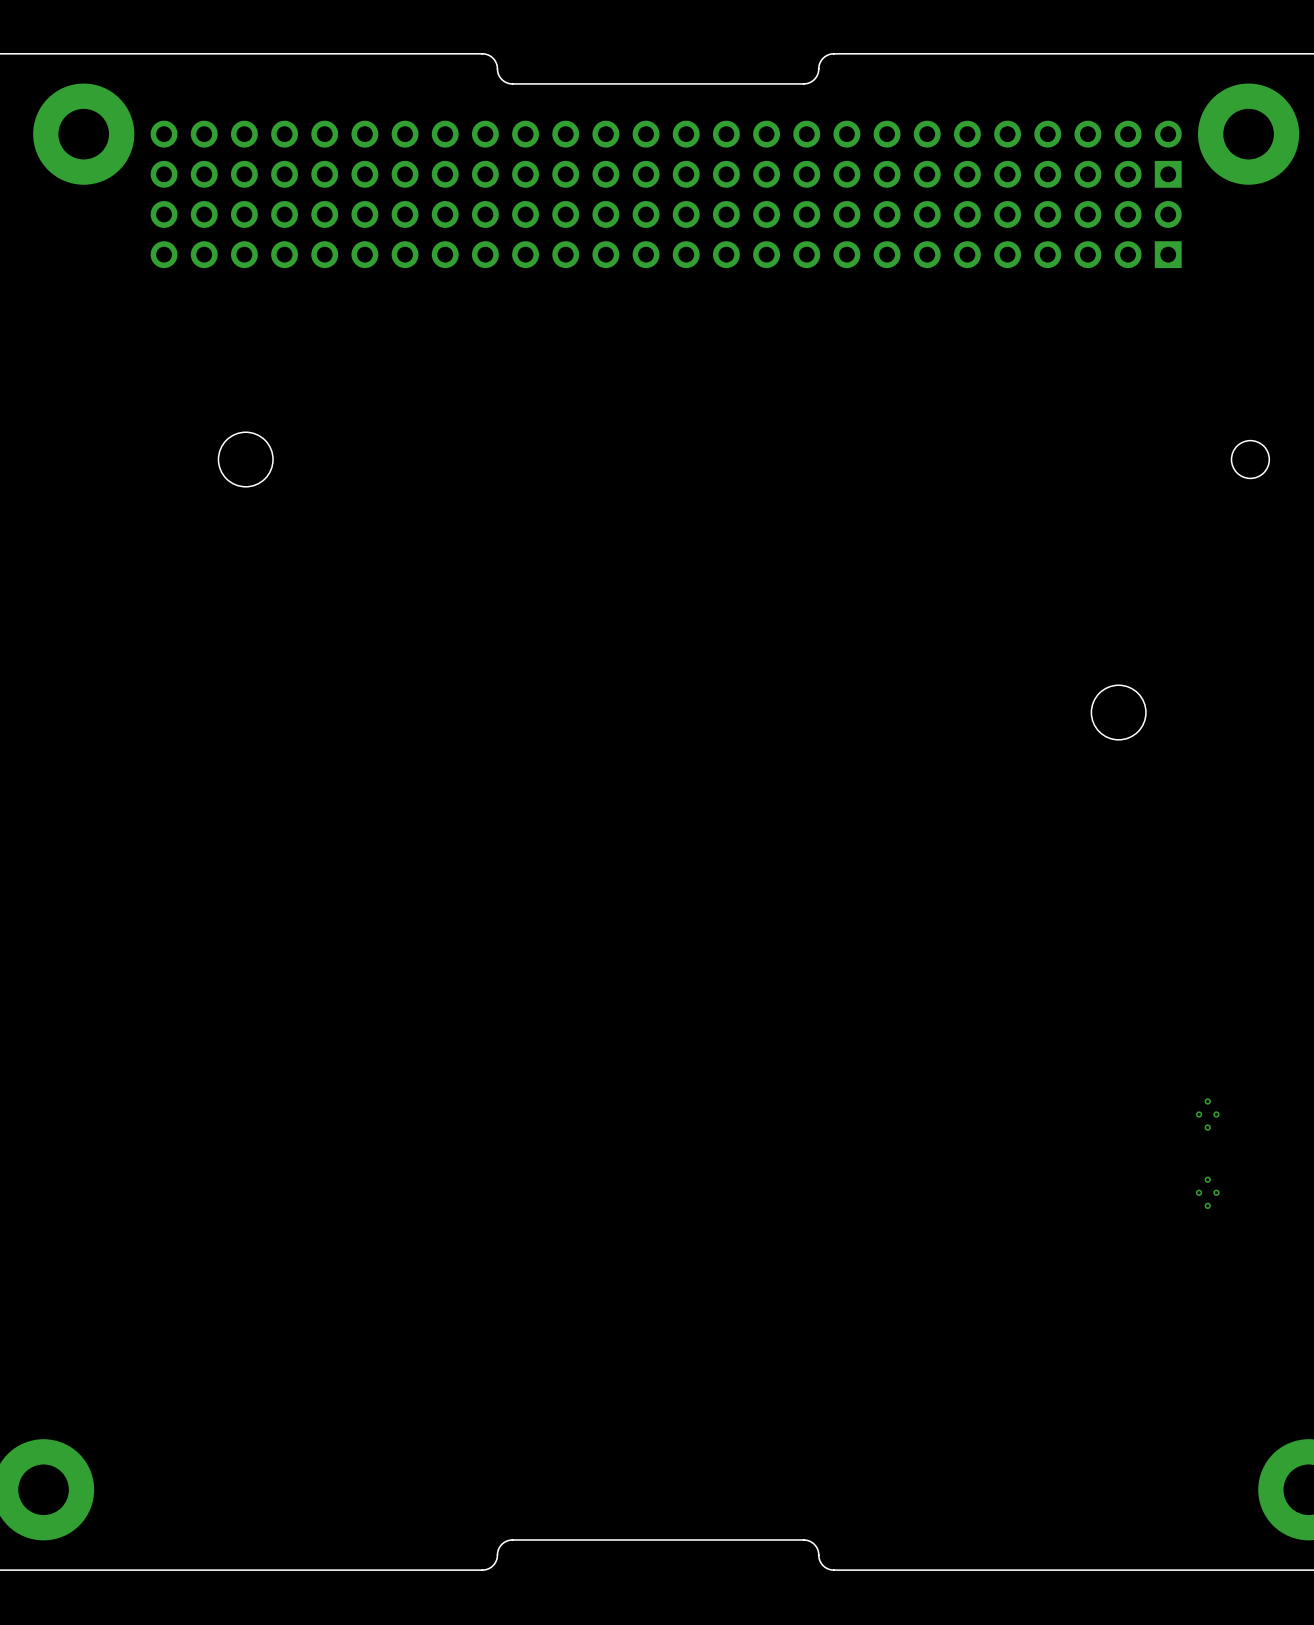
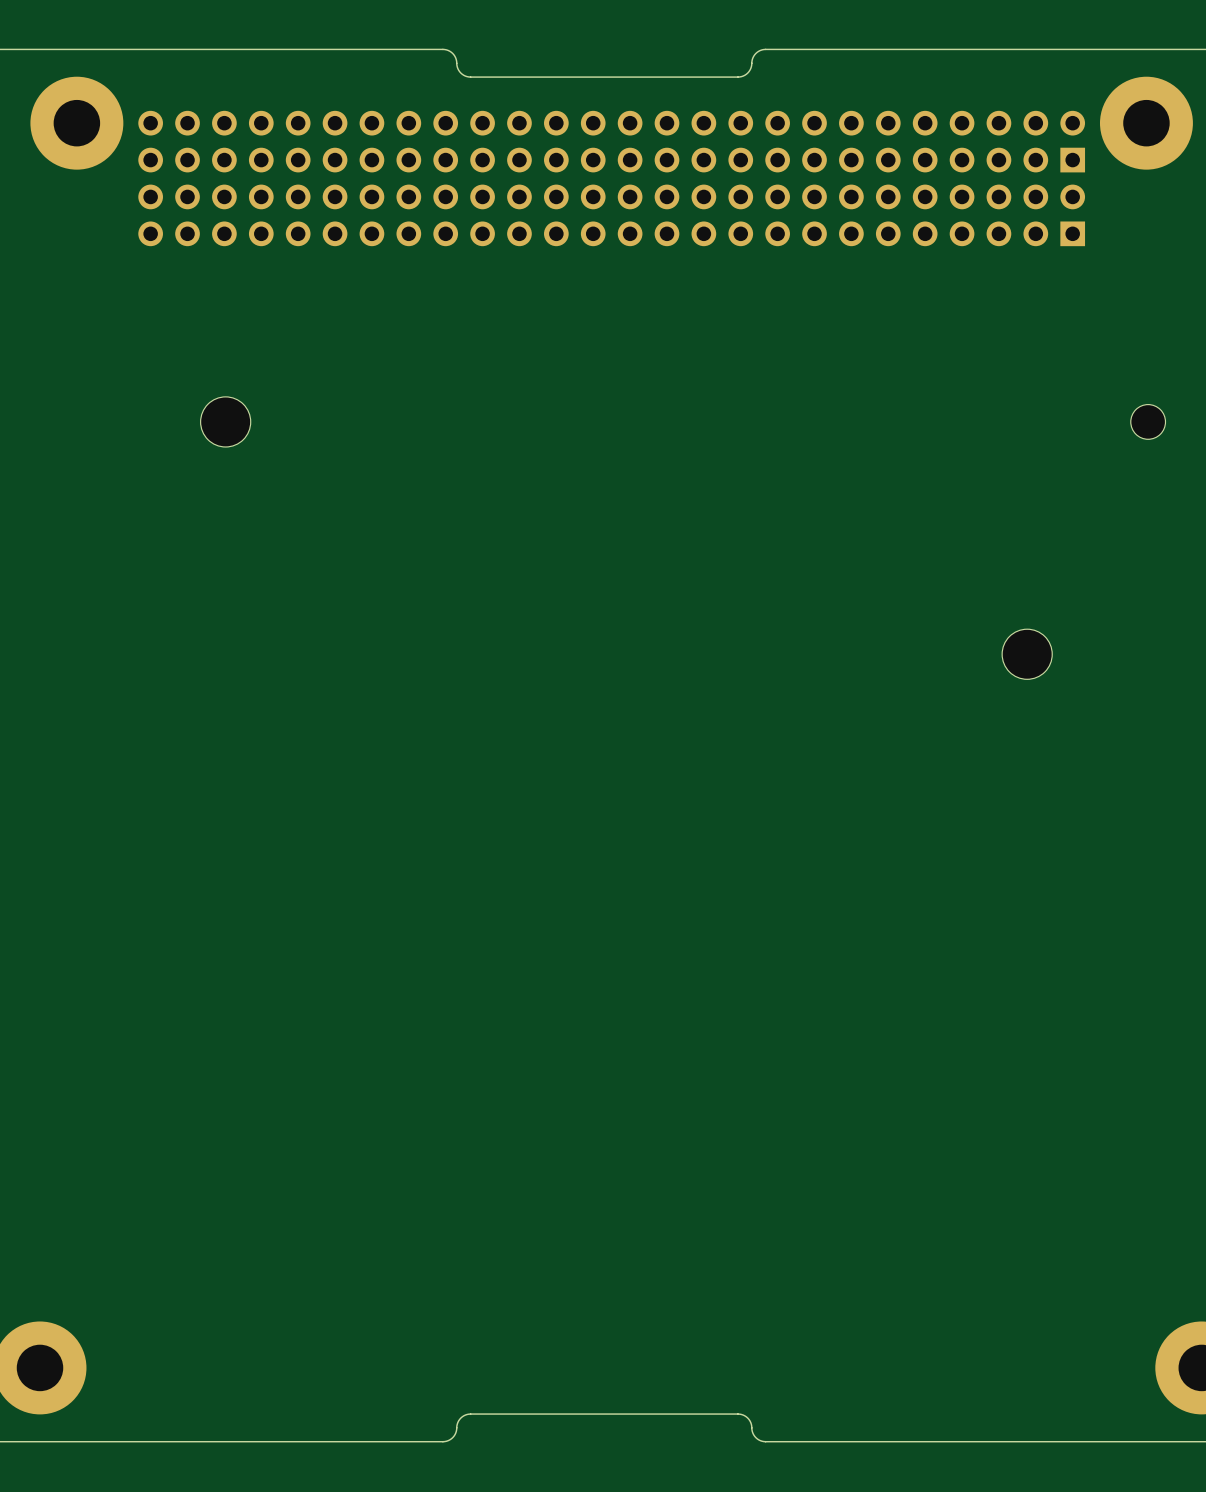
part: (1207, 1114) -> none
part: (1207, 1192) -> none

